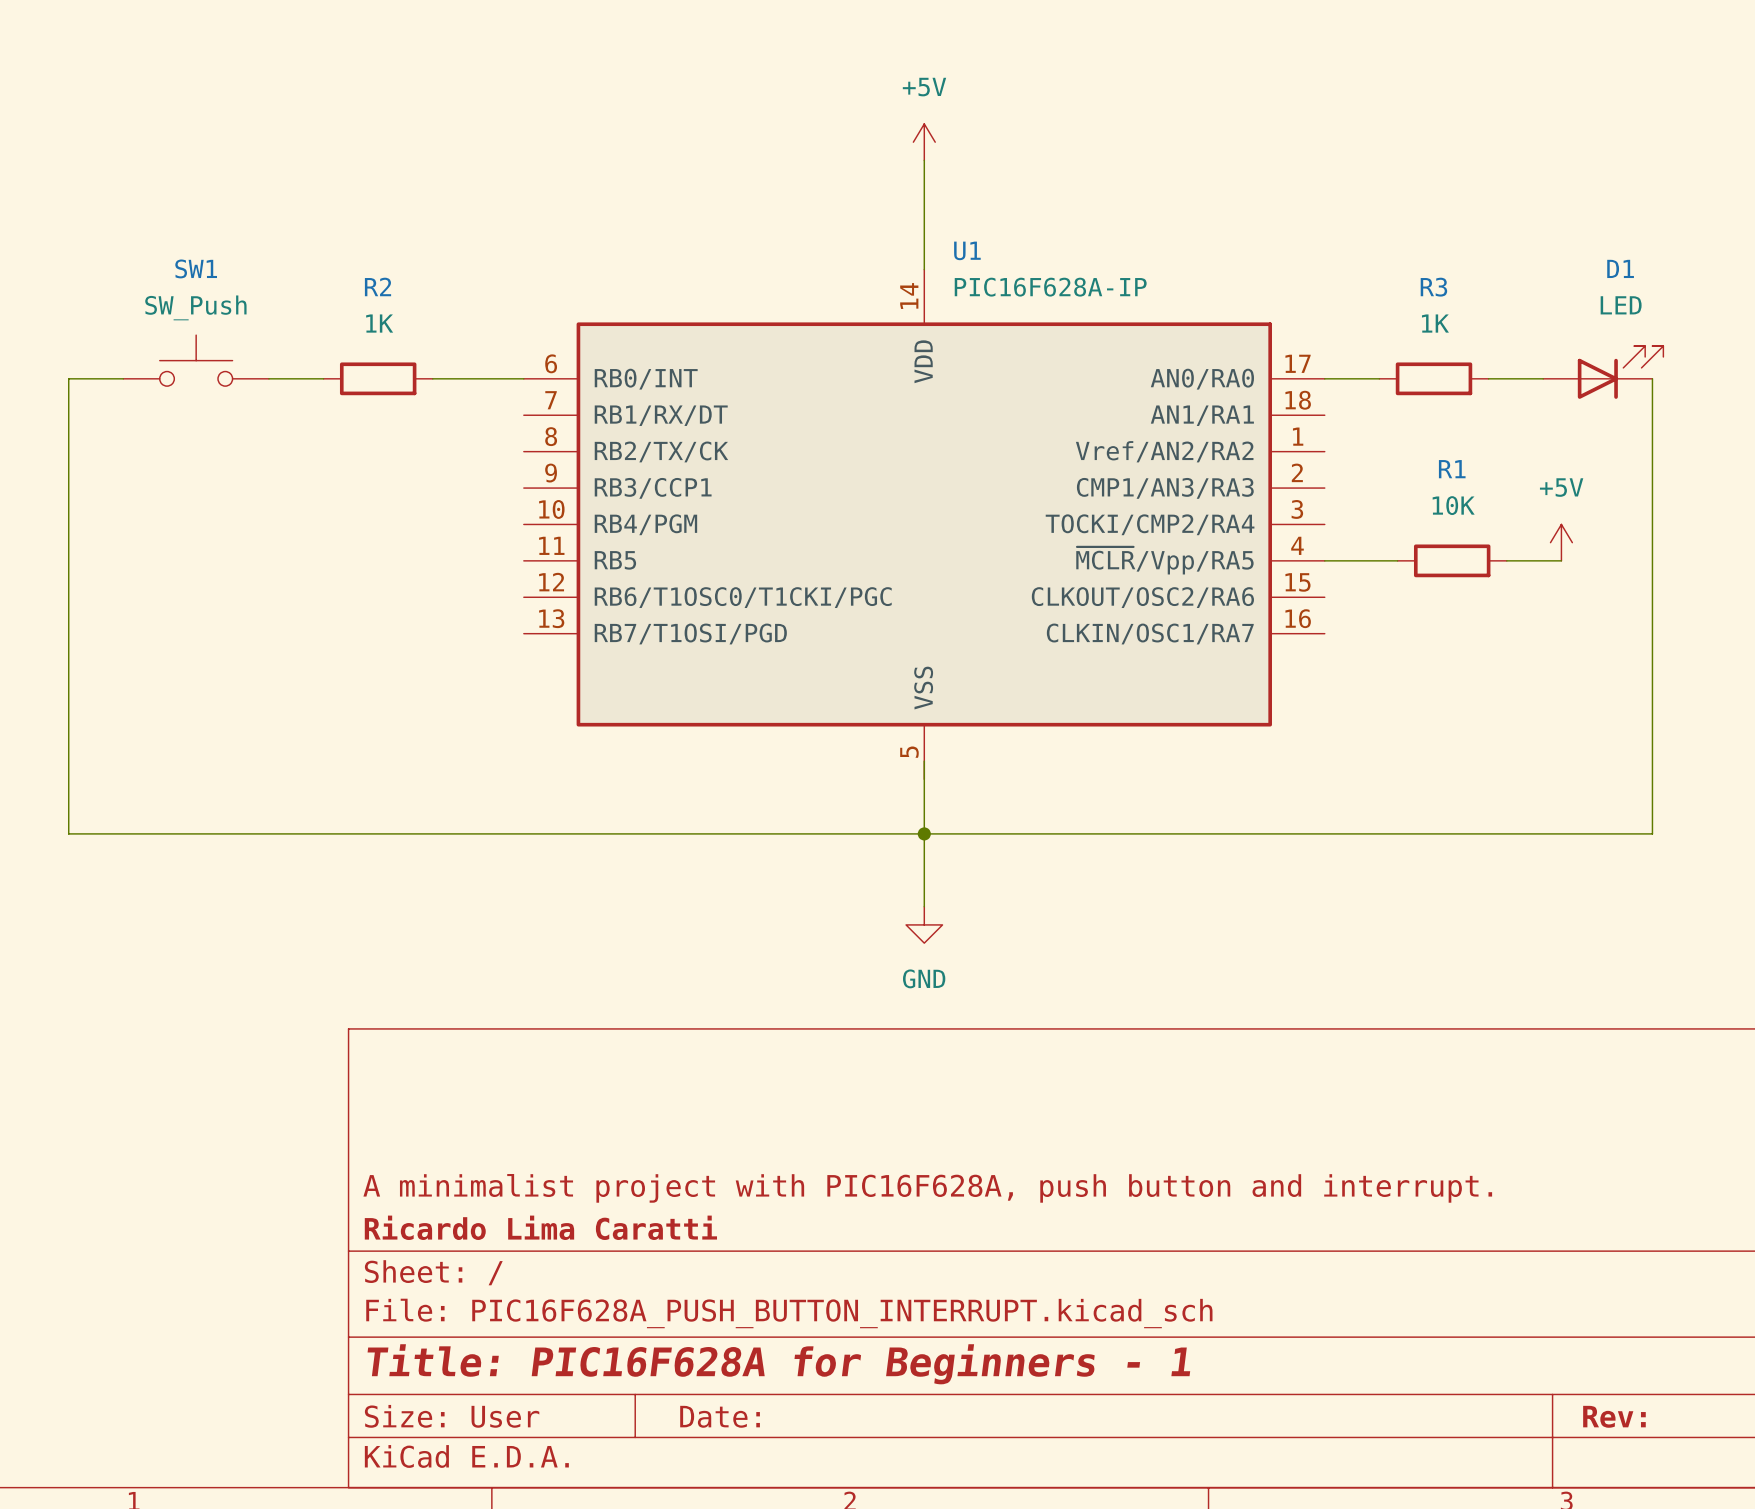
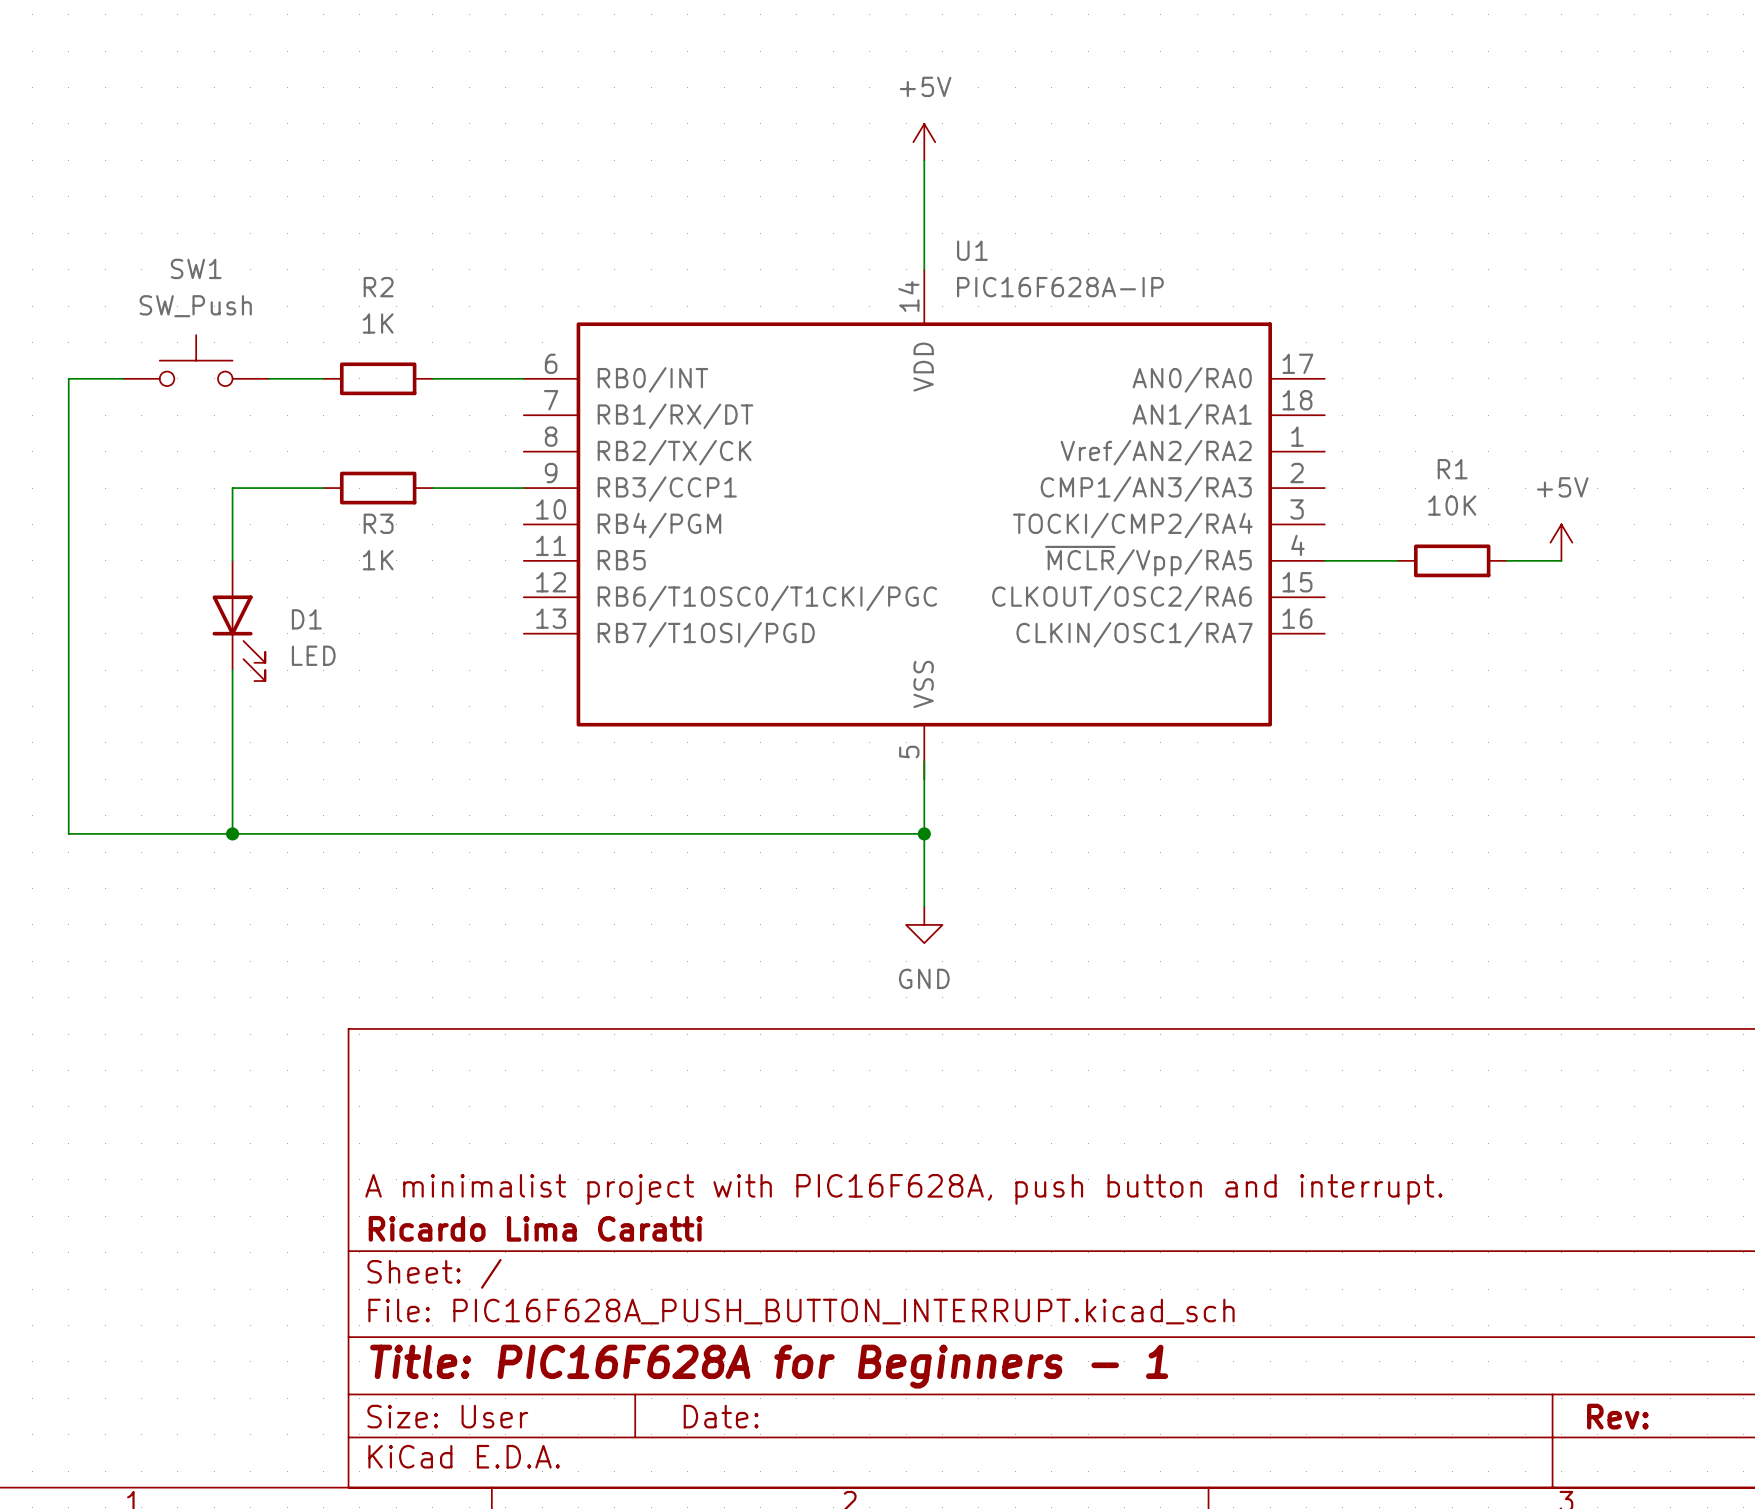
D1 name position: D1 (1620, 268) -> D1 (306, 619)
R3 name position: R3 (1433, 287) -> R3 (378, 523)
R3 value position: 1K (1435, 323) -> 1K (378, 560)
D1 position: (1603, 372) -> (238, 620)
D1 rotation: 0° (1620, 372) -> 90° clockwise (238, 638)
wire: (1324, 378) (1379, 378) -> none
R3 position: (1434, 378) -> (378, 488)
wire: (1488, 378) (1543, 378) -> none
wire: (1652, 378) (1652, 833) (924, 833) -> none
wire: none -> (323, 488) (232, 488) (232, 560)
wire: none -> (432, 488) (523, 488)
wire: none -> (232, 670) (232, 833)
junction: none -> (232, 833)

